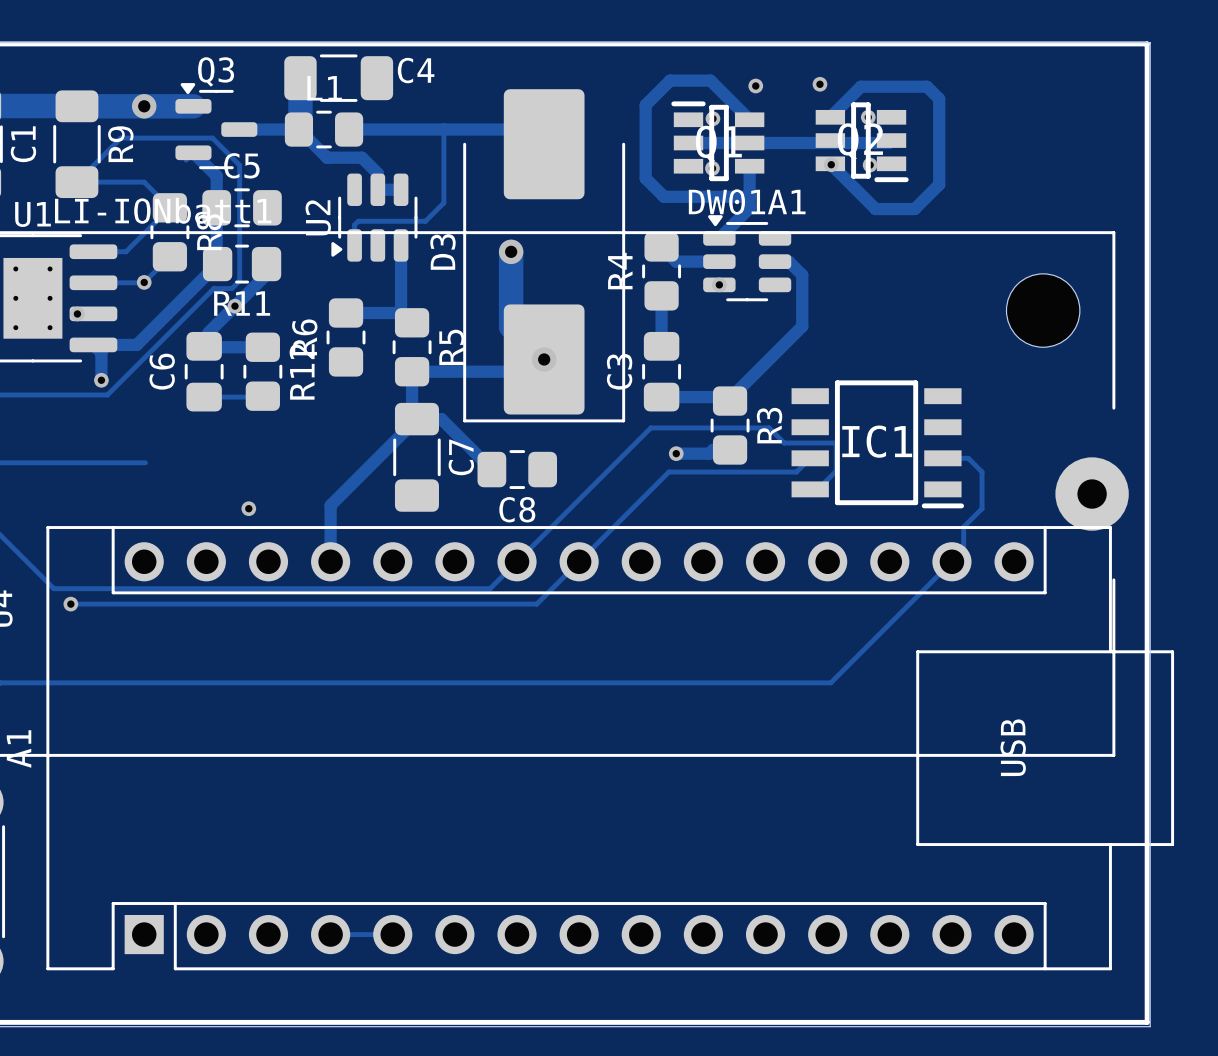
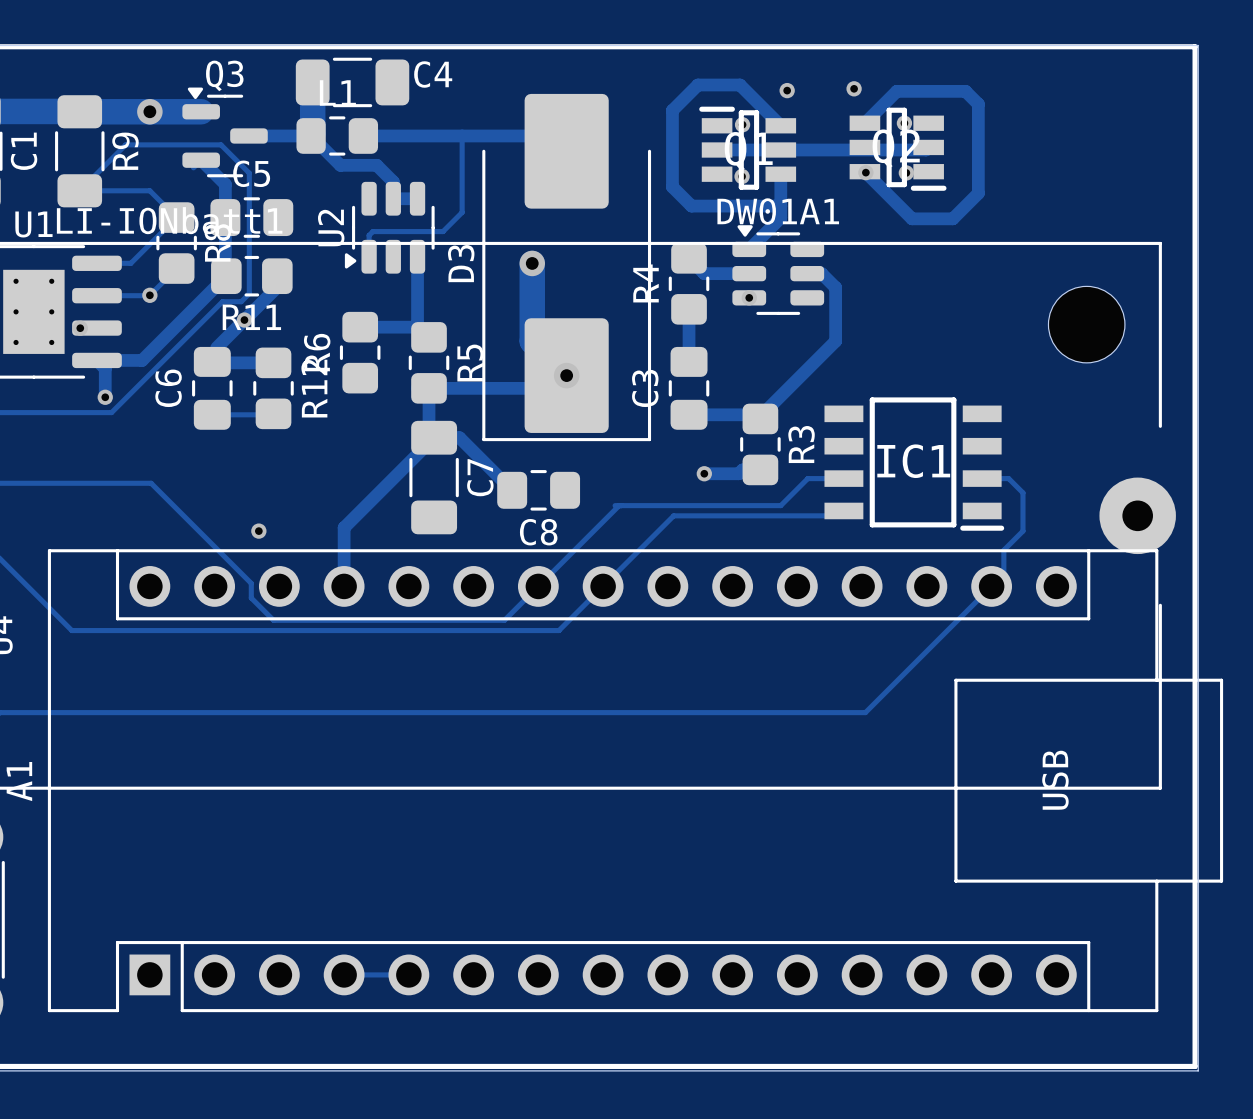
track: (810, 458) (796, 472) (668, 472) (646, 494) -> (839, 515) (673, 515)
track: none -> (843, 478) (807, 478) (780, 505) (615, 505)
track: (594, 484) (650, 427) (769, 427) (784, 442) (836, 442) (836, 471) (817, 489) (810, 489) -> none
track: (53, 588) (490, 588) -> (151, 483) (251, 583) (251, 598) (273, 620) (504, 620) (510, 614)
track: none -> (55, 614) (71, 630)
via: (70, 604) -> none

